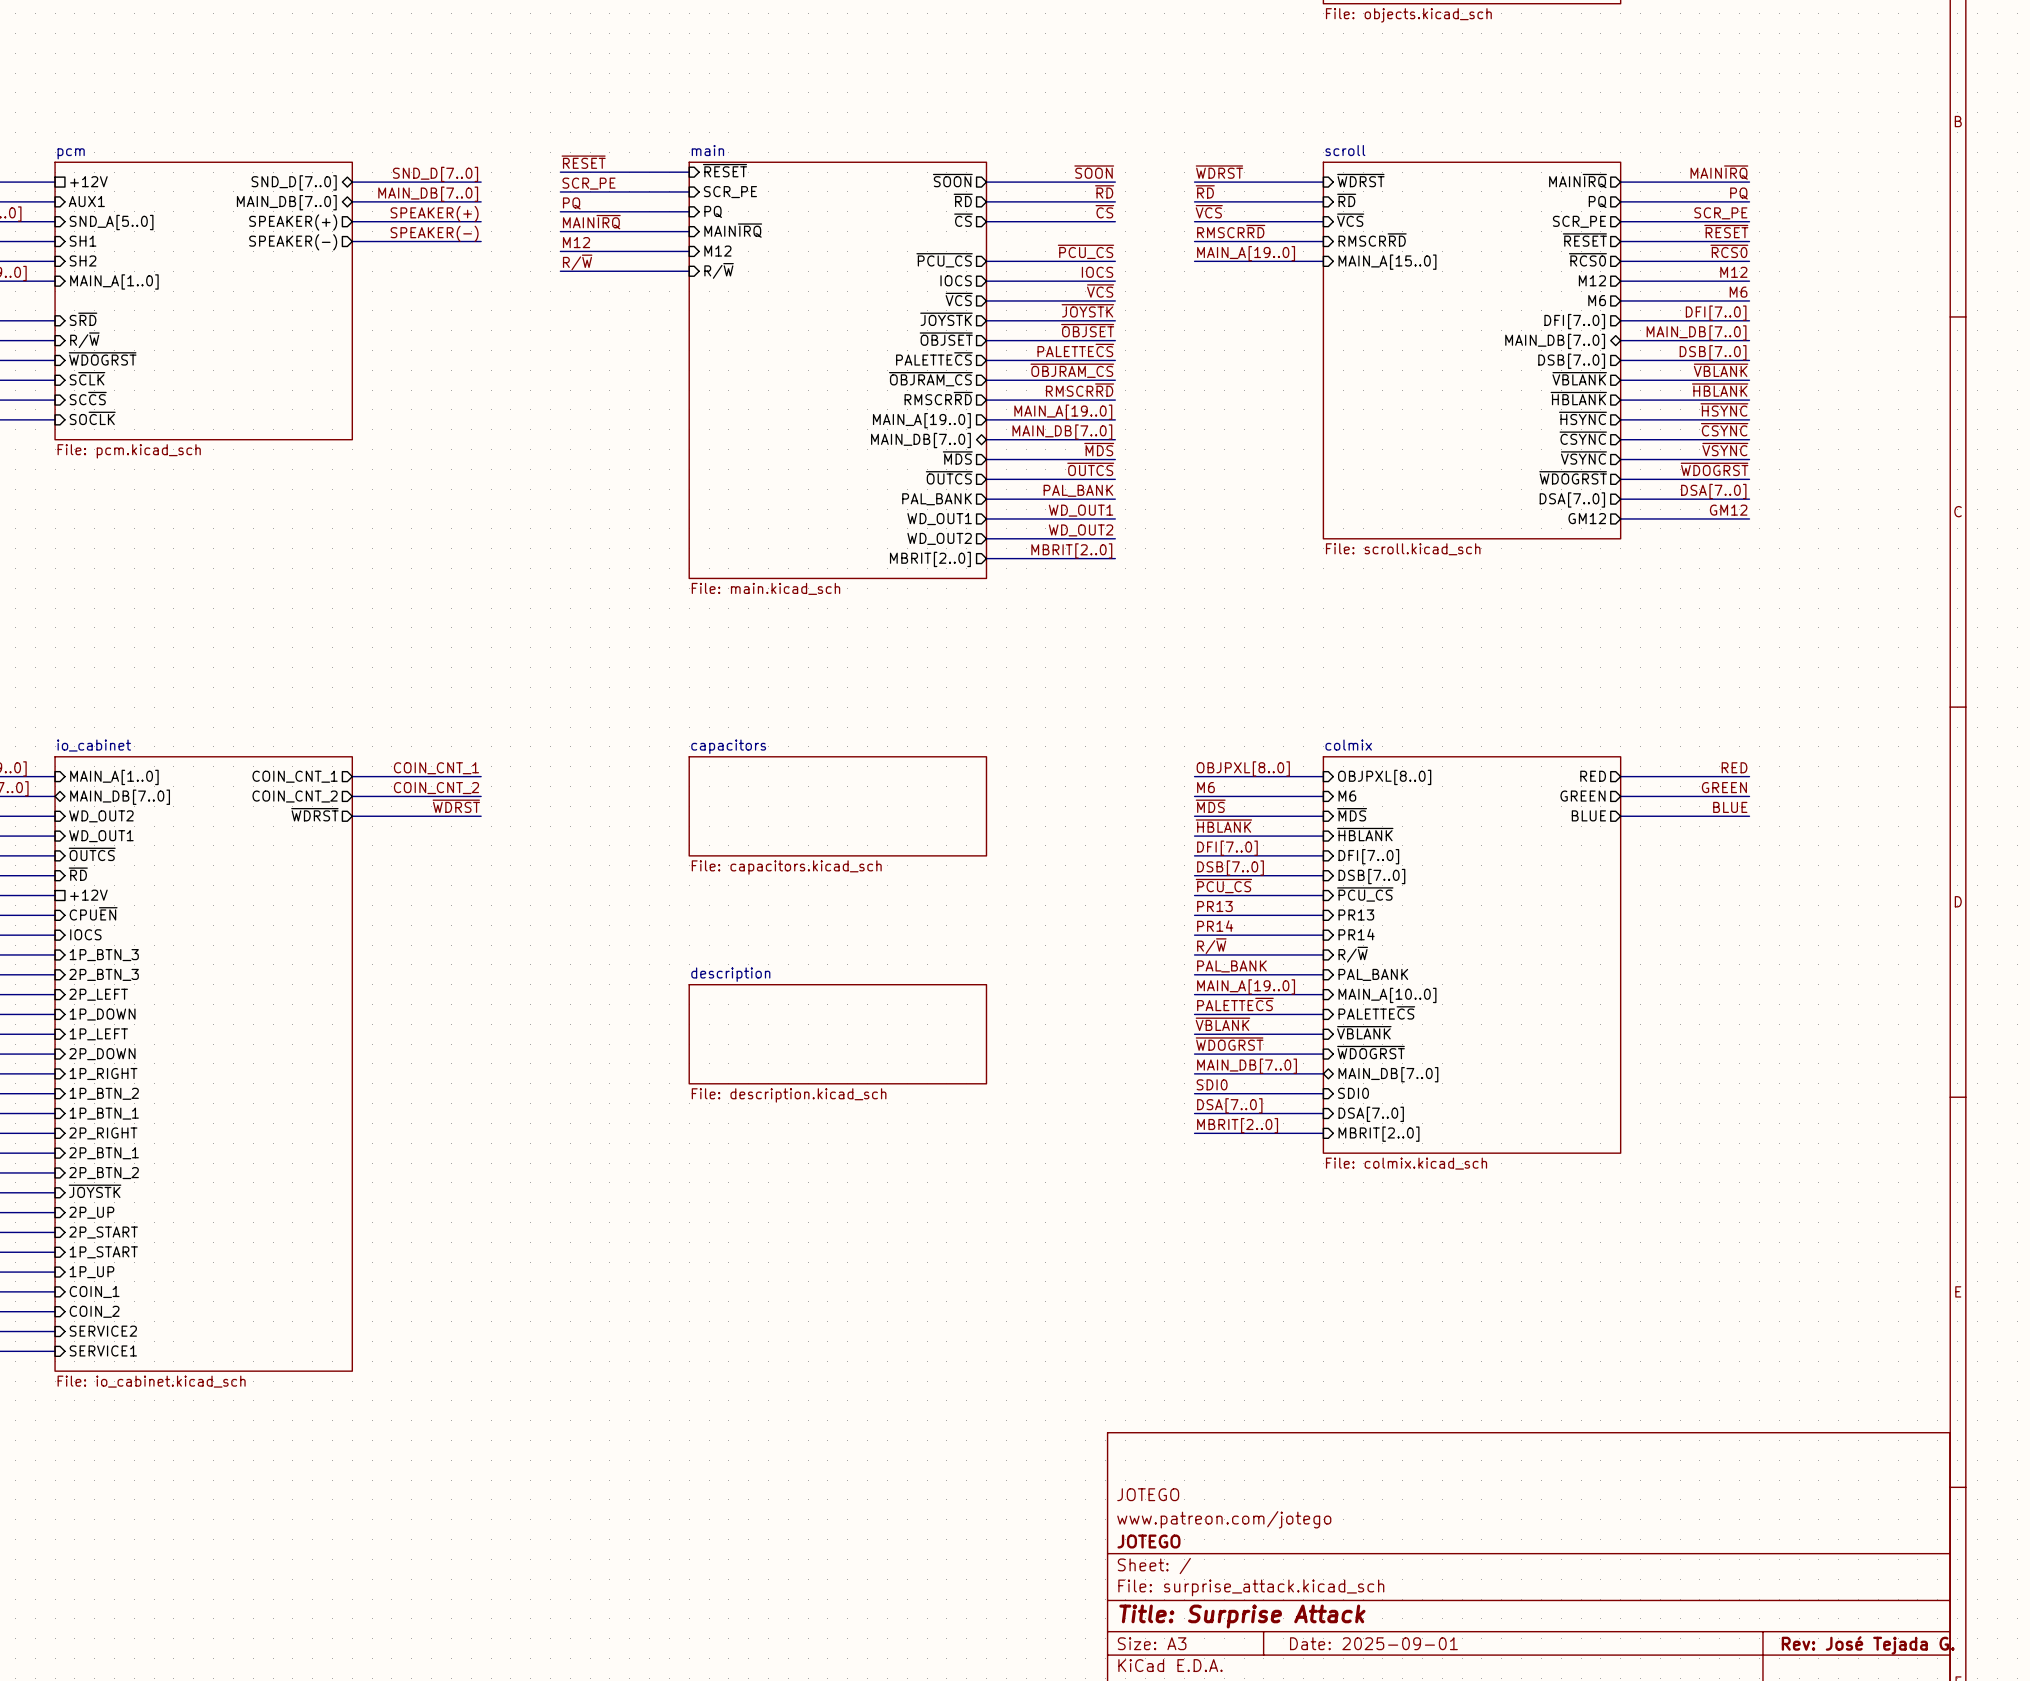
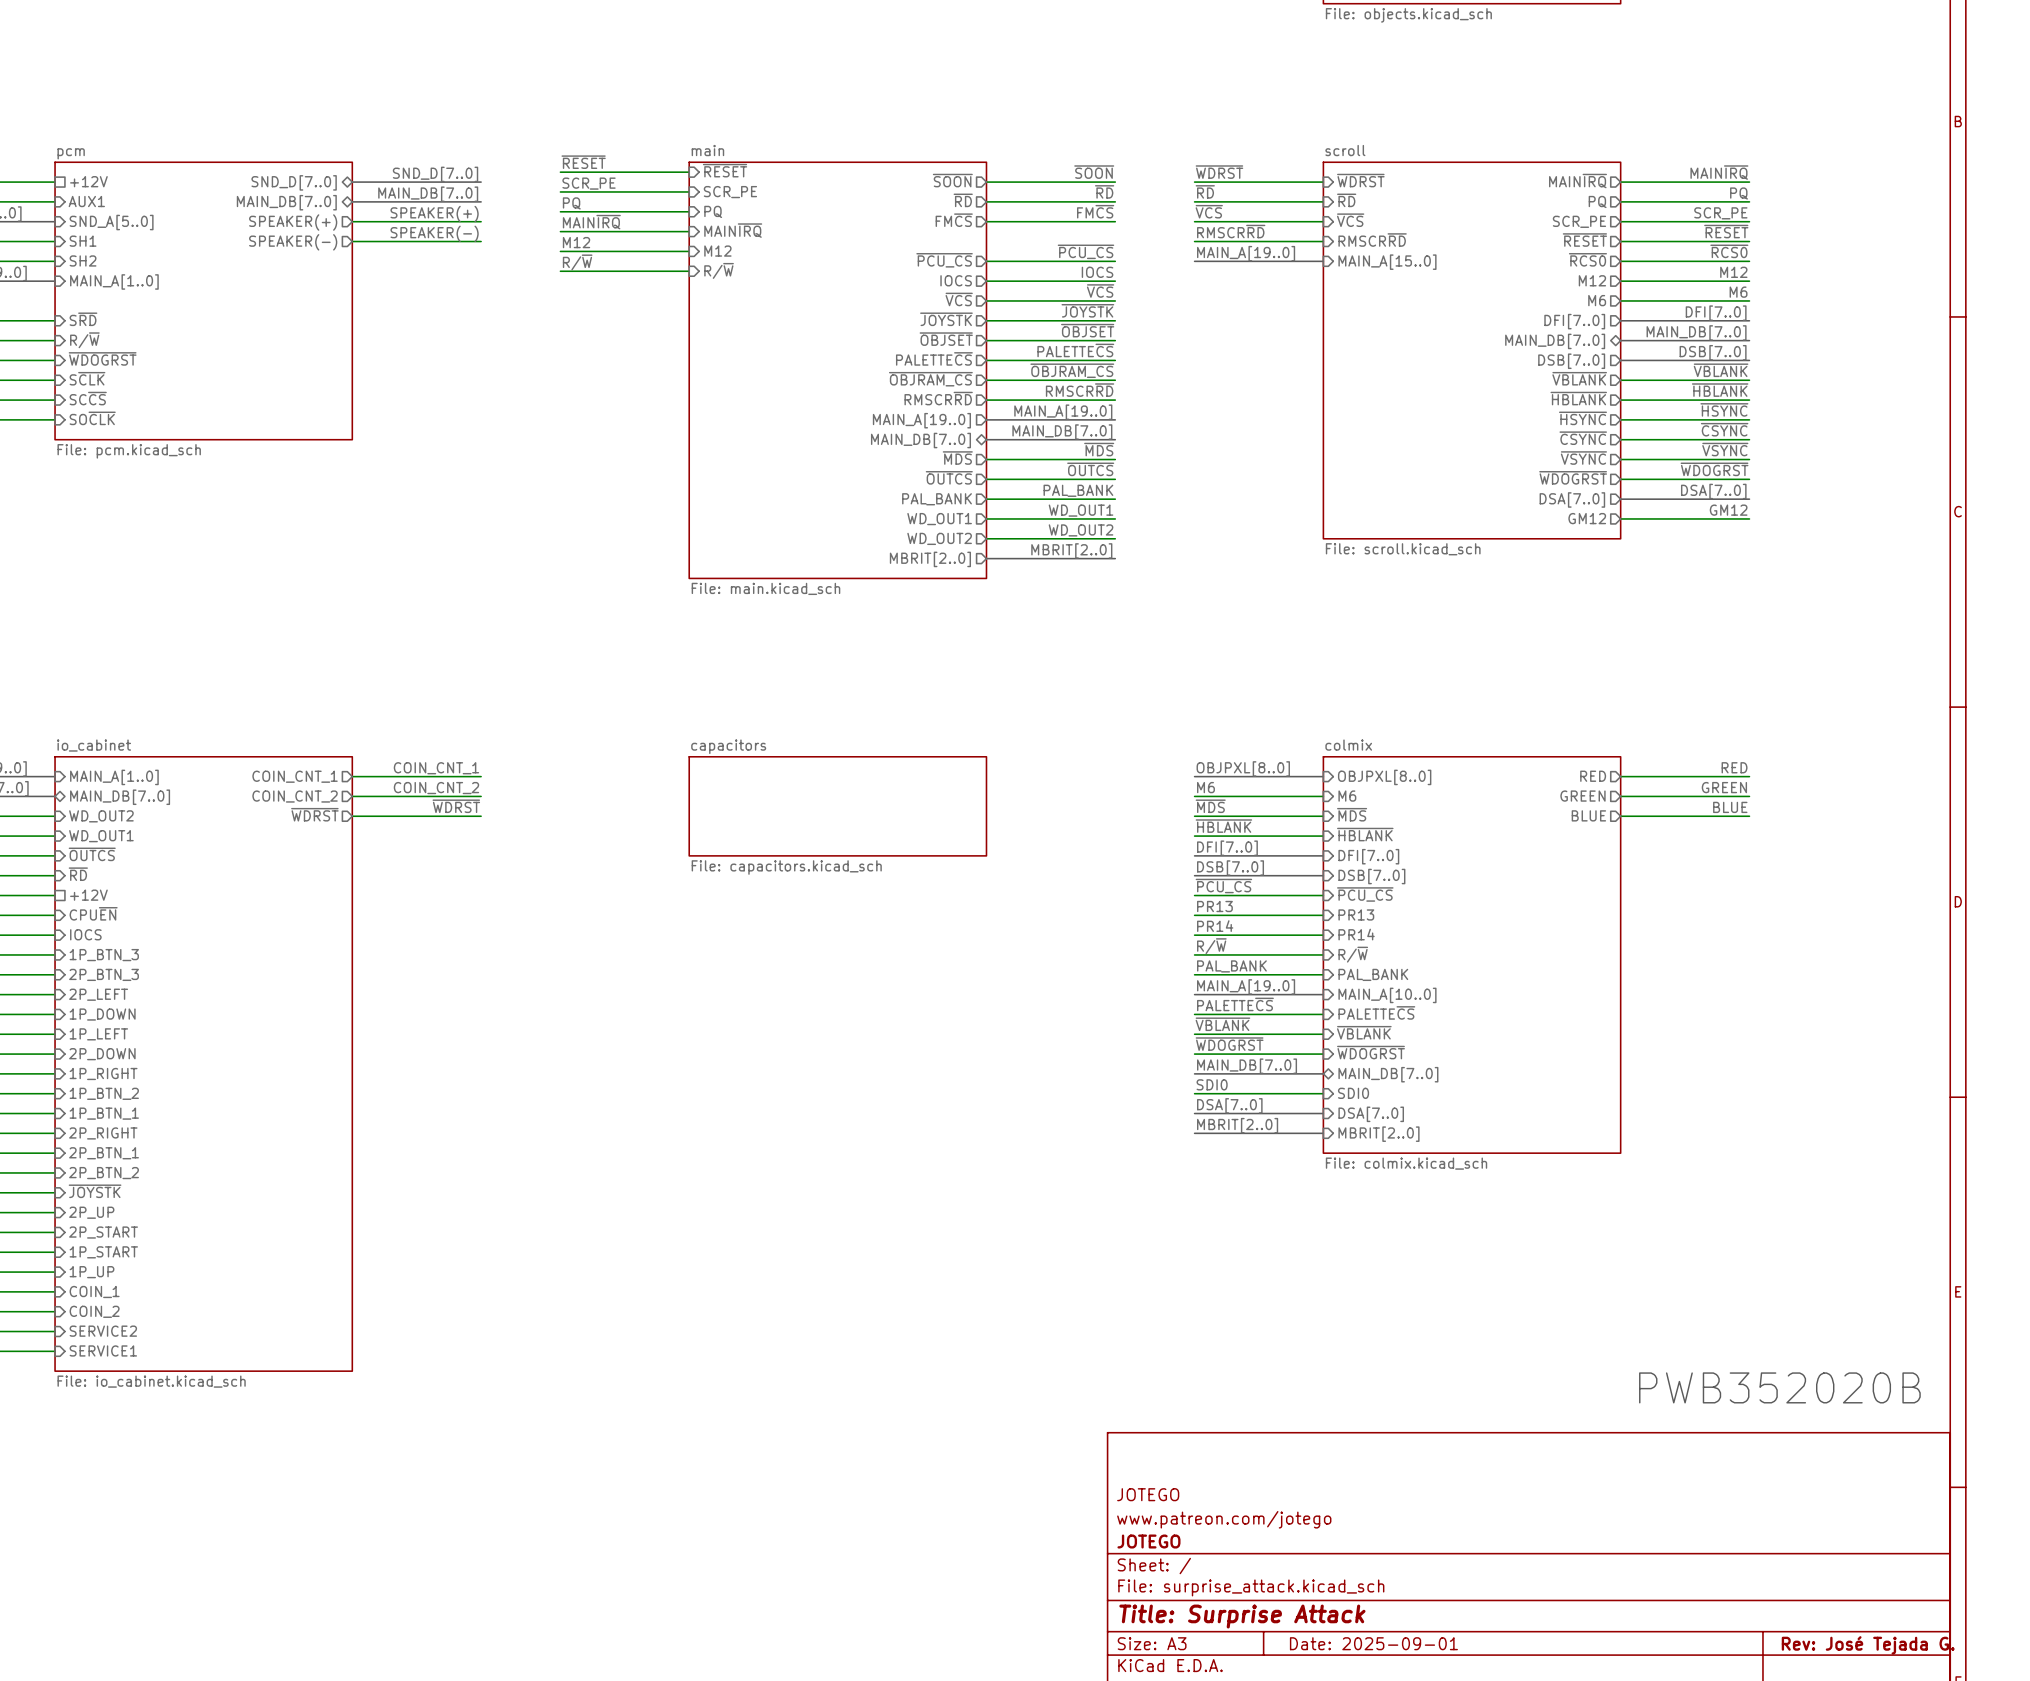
label: ~{CS} (1104, 211) -> FM~{CS} (1095, 211)
sheet pin: ~{CS} (963, 220) -> FM~{CS} (954, 220)
sheet description: File: description.kicad_sch (837, 1034) -> none
text: none -> PWB352020B (1779, 1387)

